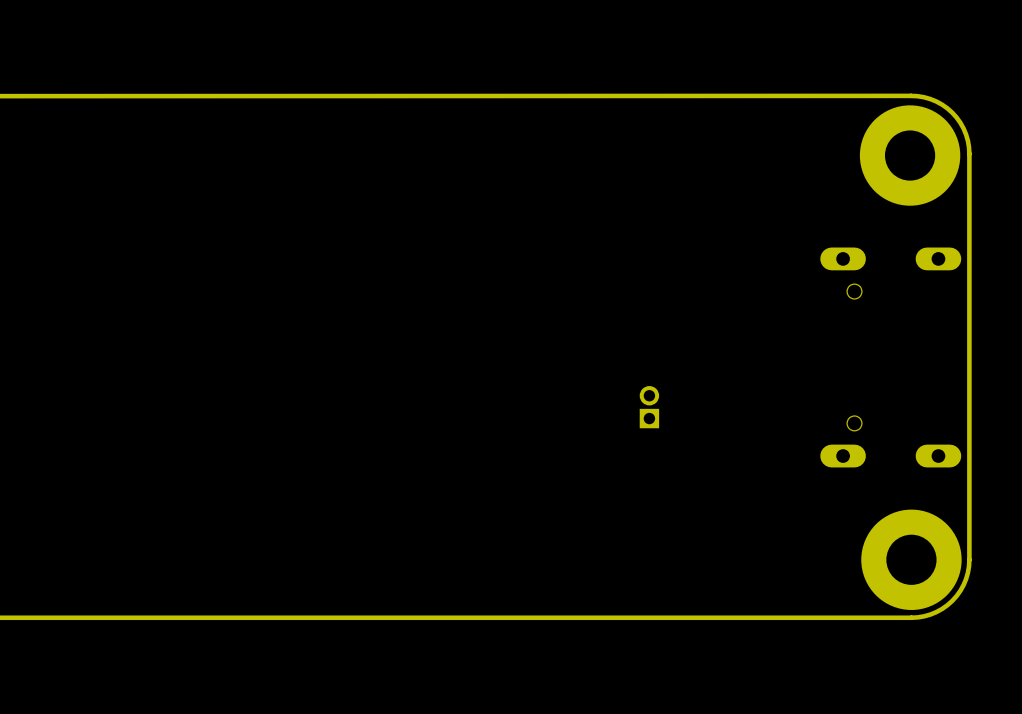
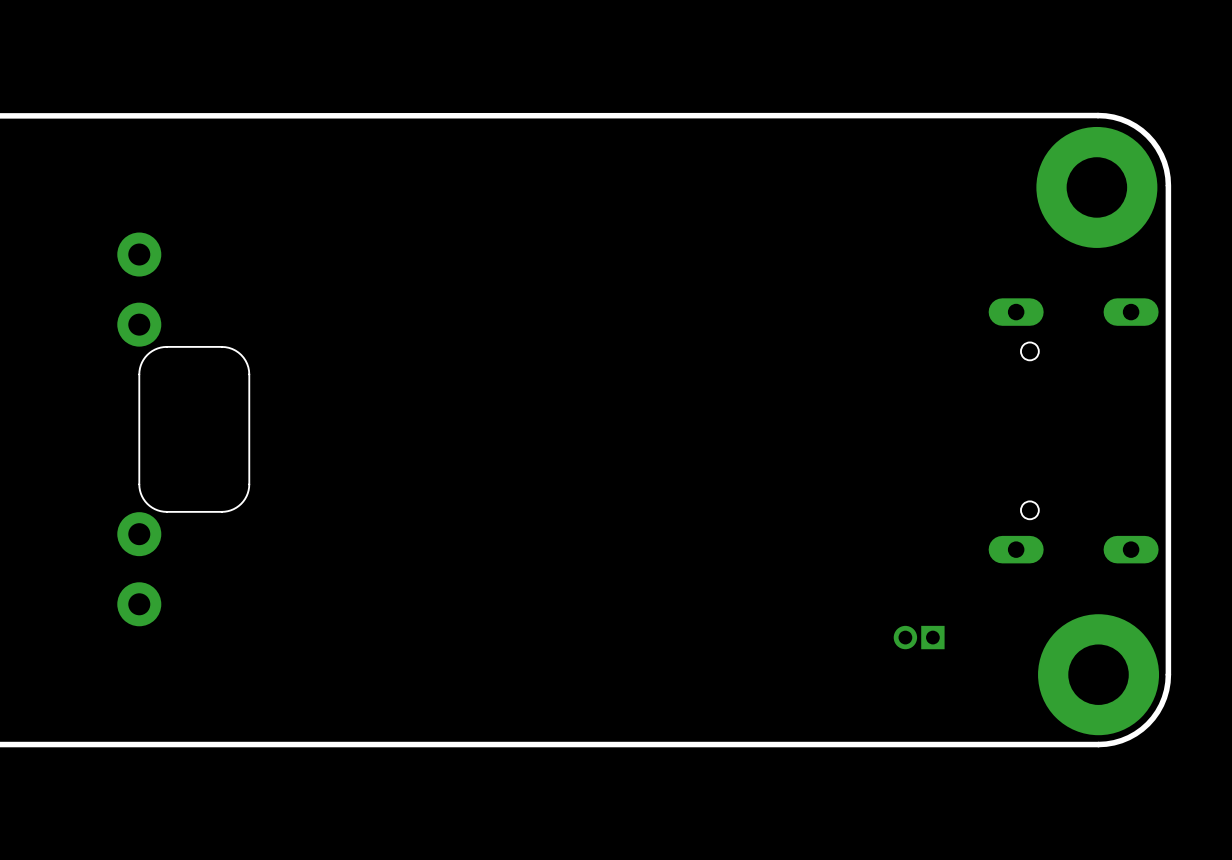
part: none -> (183, 429)
part rotation: 0° (649, 407) -> 90° counterclockwise (919, 637)
part position: (649, 407) -> (919, 637)

